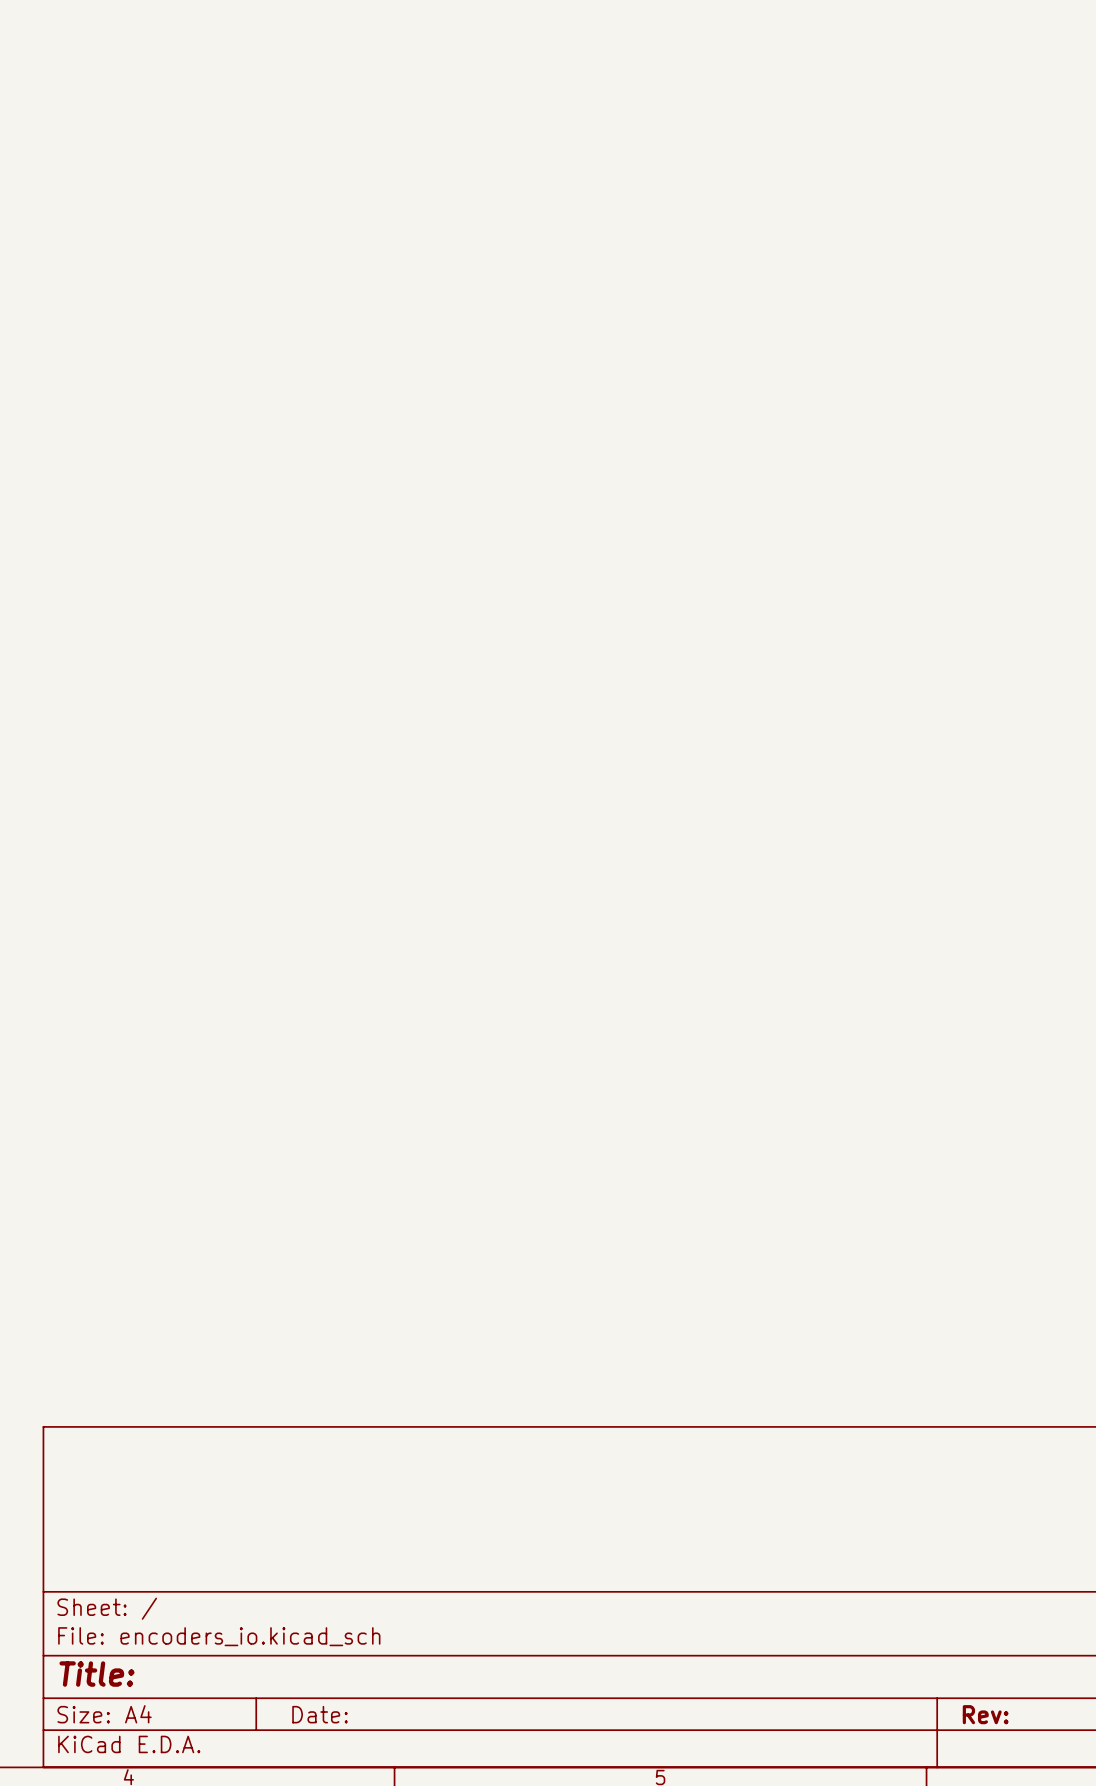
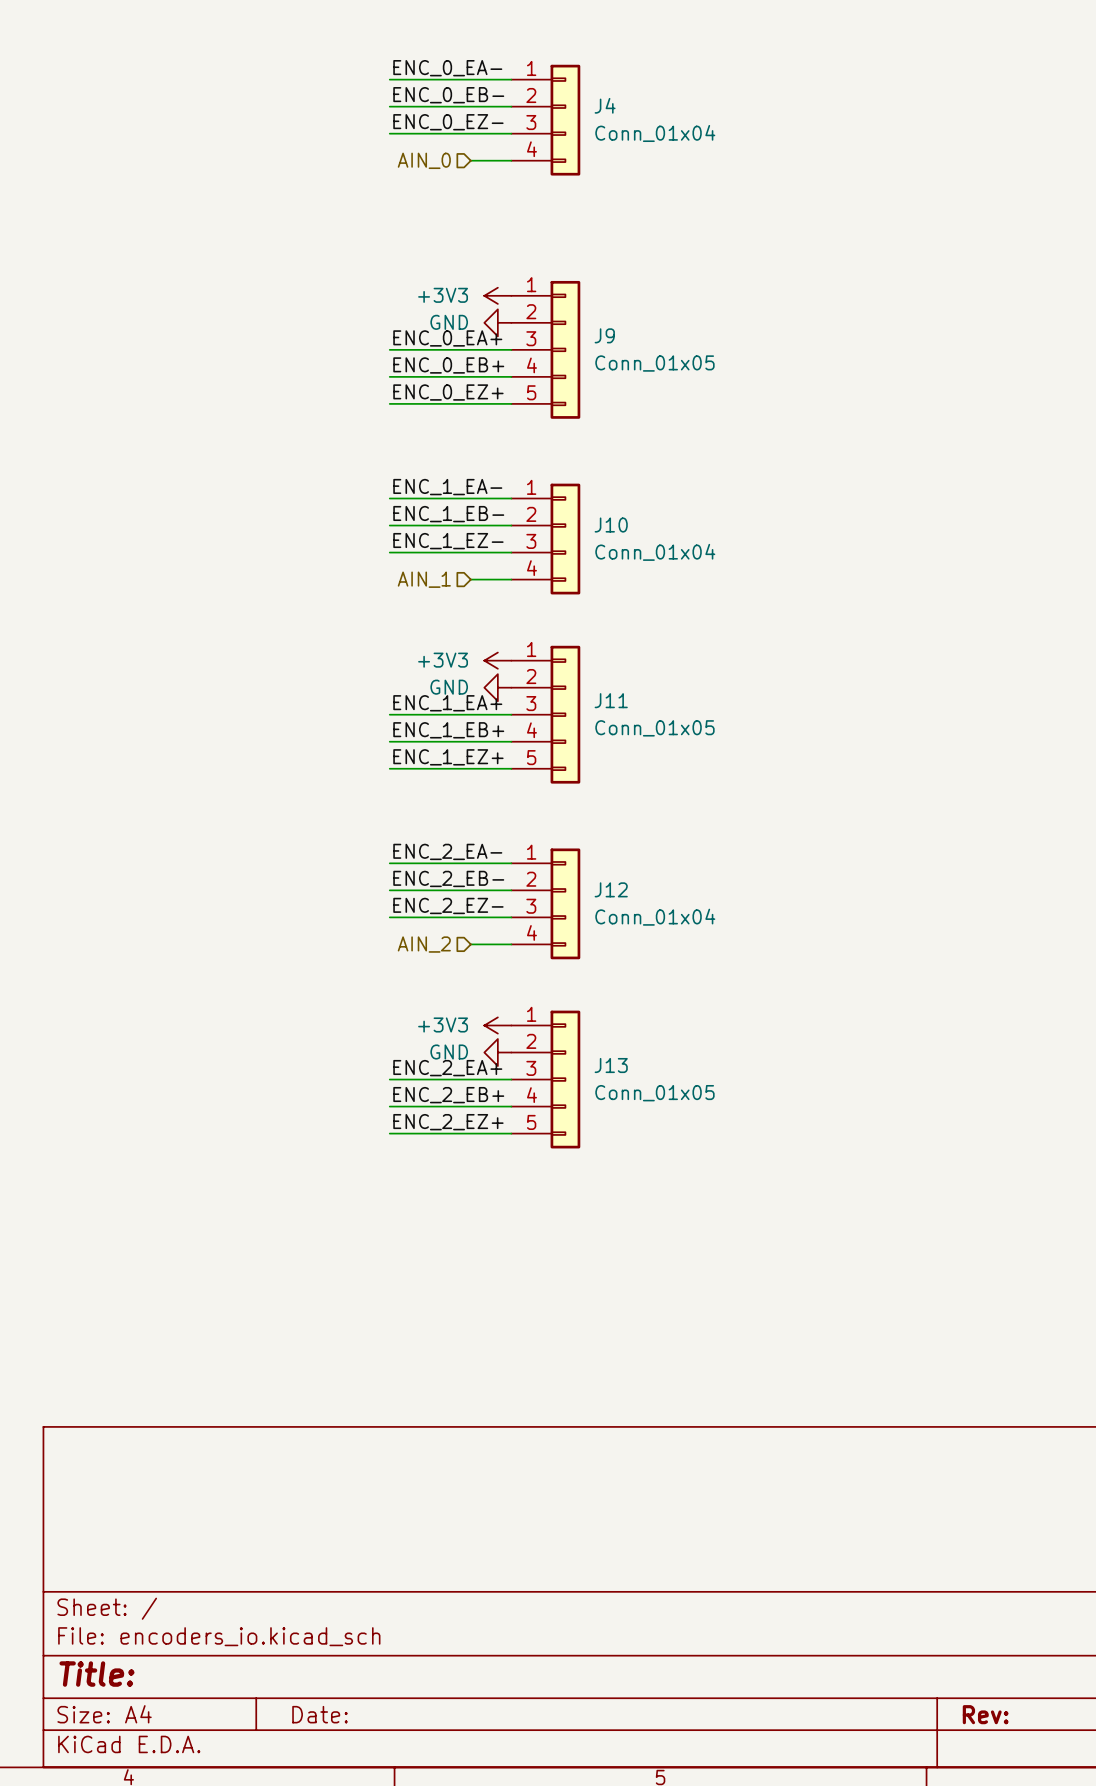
label: none -> ENC_0_EA- (447, 68)
wire: none -> (389, 79) (511, 79)
label: none -> ENC_0_EB- (448, 95)
wire: none -> (389, 106) (511, 106)
J4: none -> Conn_01x04 (545, 120)
label: none -> ENC_0_EZ- (448, 122)
wire: none -> (389, 133) (511, 133)
hierarchical label: none -> AIN_0 (424, 160)
wire: none -> (470, 160) (511, 160)
power symbol: none -> +3V3 (497, 295)
power symbol: none -> GND (497, 322)
label: none -> ENC_0_EA+ (447, 338)
wire: none -> (389, 349) (511, 349)
J9: none -> Conn_01x05 (545, 349)
label: none -> ENC_0_EB+ (448, 365)
wire: none -> (389, 376) (511, 376)
label: none -> ENC_0_EZ+ (448, 392)
wire: none -> (389, 403) (511, 403)
label: none -> ENC_1_EA- (447, 487)
wire: none -> (389, 498) (511, 498)
label: none -> ENC_1_EB- (448, 514)
wire: none -> (389, 525) (511, 525)
J10: none -> Conn_01x04 (545, 539)
label: none -> ENC_1_EZ- (448, 541)
wire: none -> (389, 552) (511, 552)
hierarchical label: none -> AIN_1 (424, 579)
wire: none -> (470, 579) (511, 579)
power symbol: none -> +3V3 (497, 660)
power symbol: none -> GND (497, 687)
label: none -> ENC_1_EA+ (447, 703)
wire: none -> (389, 714) (511, 714)
J11: none -> Conn_01x05 (545, 714)
label: none -> ENC_1_EB+ (448, 730)
wire: none -> (389, 741) (511, 741)
label: none -> ENC_1_EZ+ (448, 757)
wire: none -> (389, 768) (511, 768)
label: none -> ENC_2_EA- (447, 851)
wire: none -> (389, 863) (511, 863)
label: none -> ENC_2_EB- (448, 878)
wire: none -> (389, 890) (511, 890)
J12: none -> Conn_01x04 (545, 903)
label: none -> ENC_2_EZ- (448, 905)
wire: none -> (389, 917) (511, 917)
hierarchical label: none -> AIN_2 (424, 944)
wire: none -> (470, 944) (511, 944)
power symbol: none -> +3V3 (497, 1025)
power symbol: none -> GND (497, 1052)
label: none -> ENC_2_EA+ (447, 1068)
wire: none -> (389, 1079) (511, 1079)
J13: none -> Conn_01x05 (545, 1079)
label: none -> ENC_2_EB+ (448, 1095)
wire: none -> (389, 1106) (511, 1106)
label: none -> ENC_2_EZ+ (448, 1122)
wire: none -> (389, 1133) (511, 1133)

